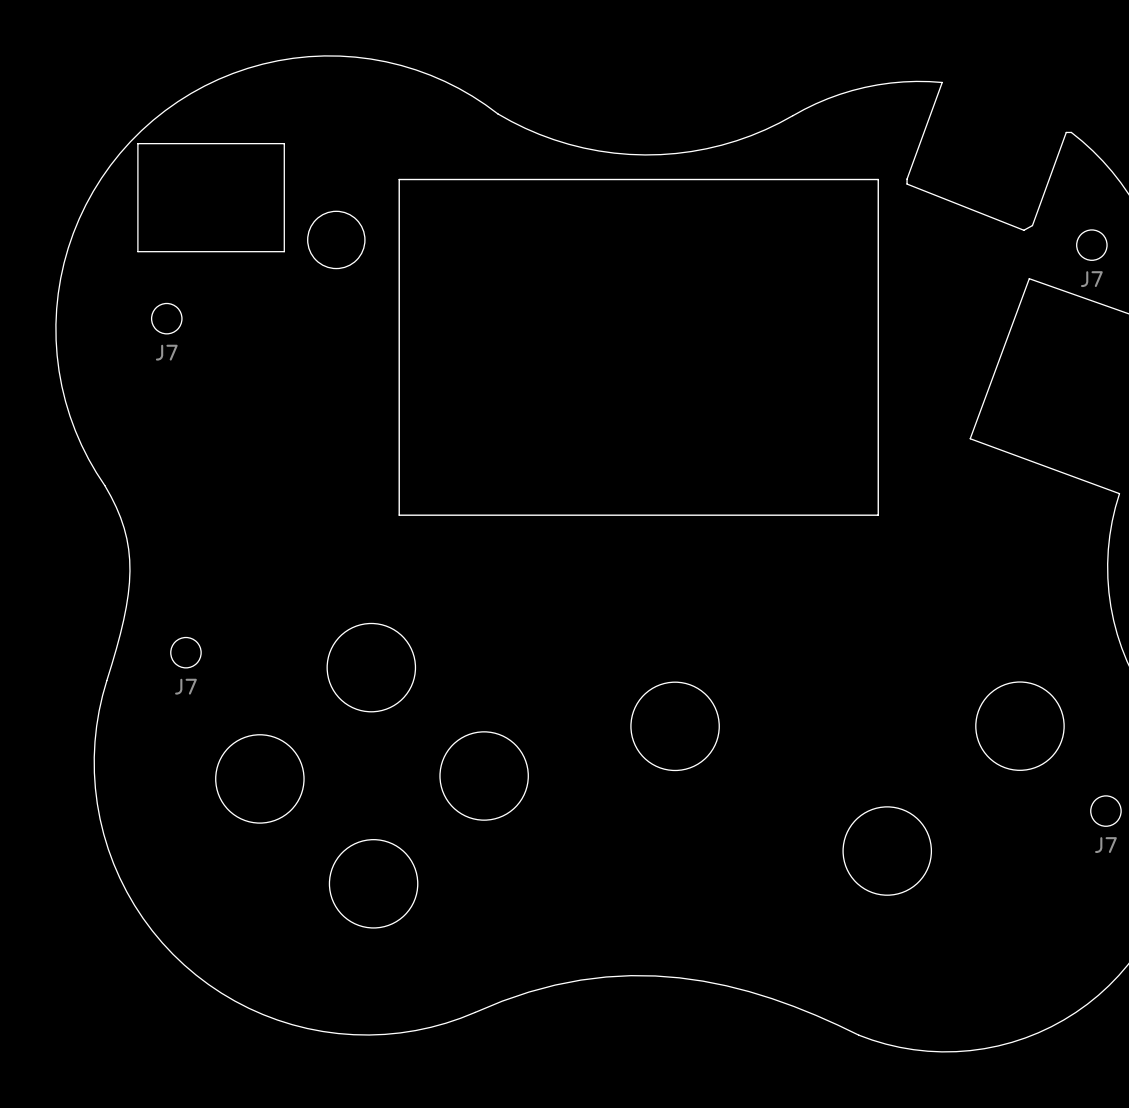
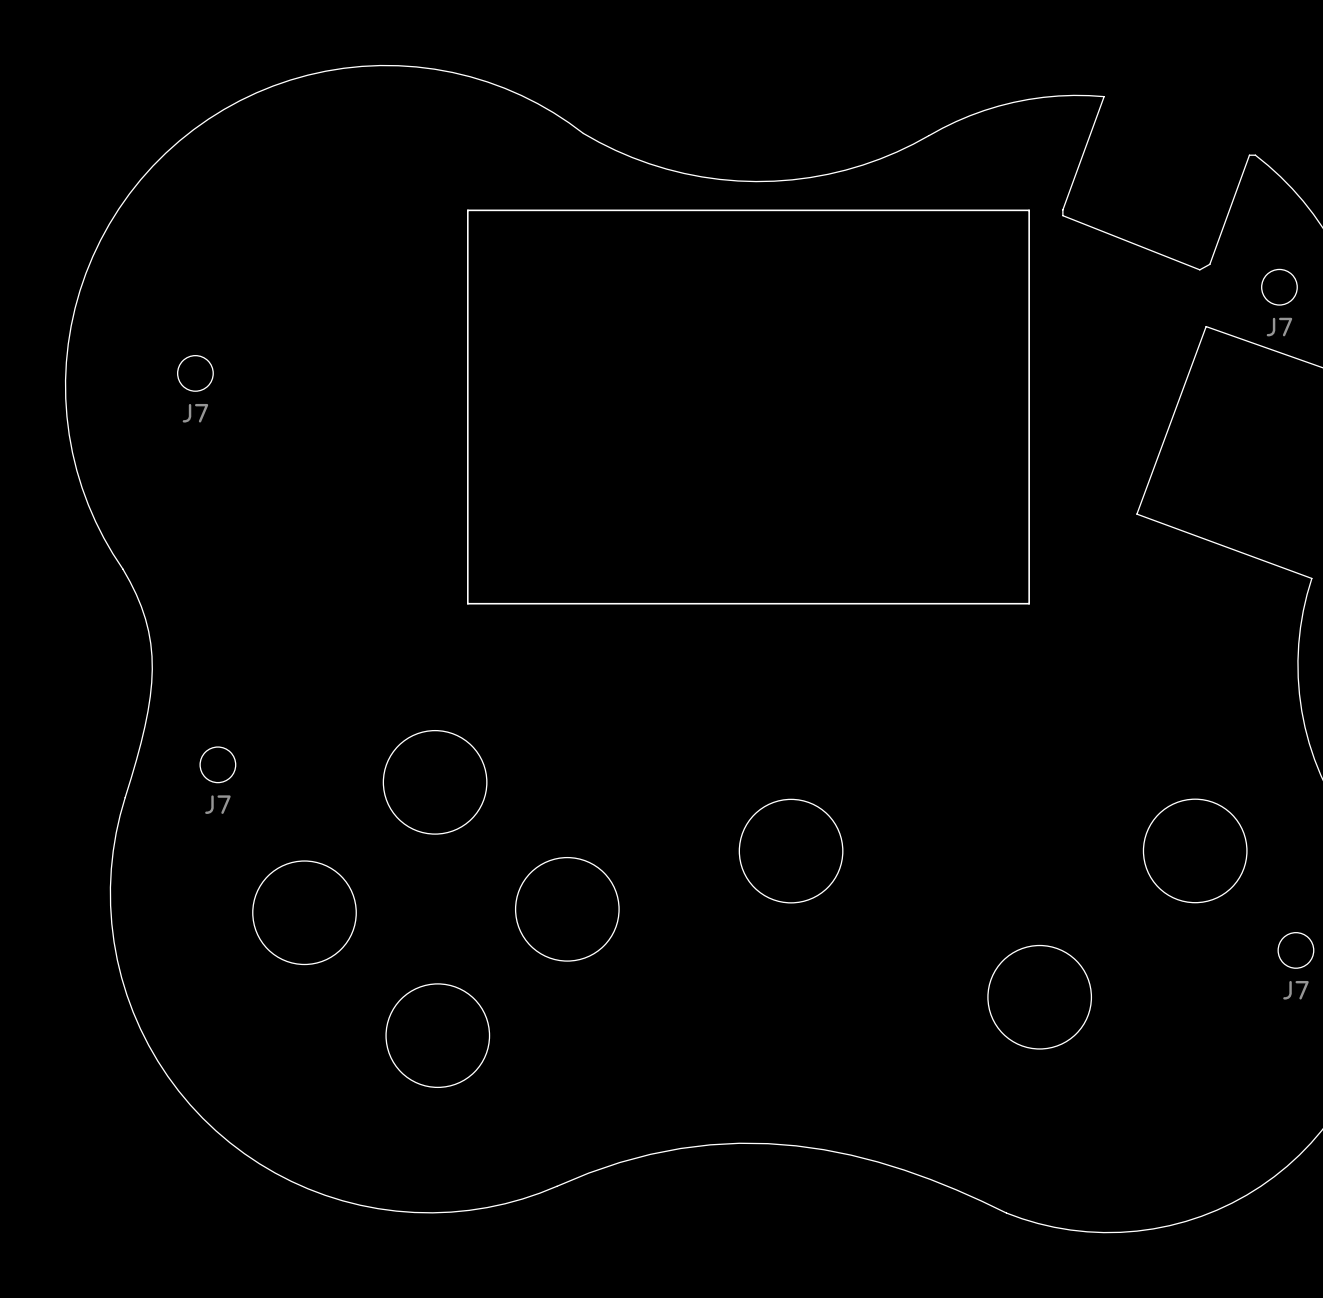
board edge: (137, 143) (284, 143) (284, 251) (137, 251) (137, 143) -> none
round board edge: [307, 210, 366, 269] -> none

